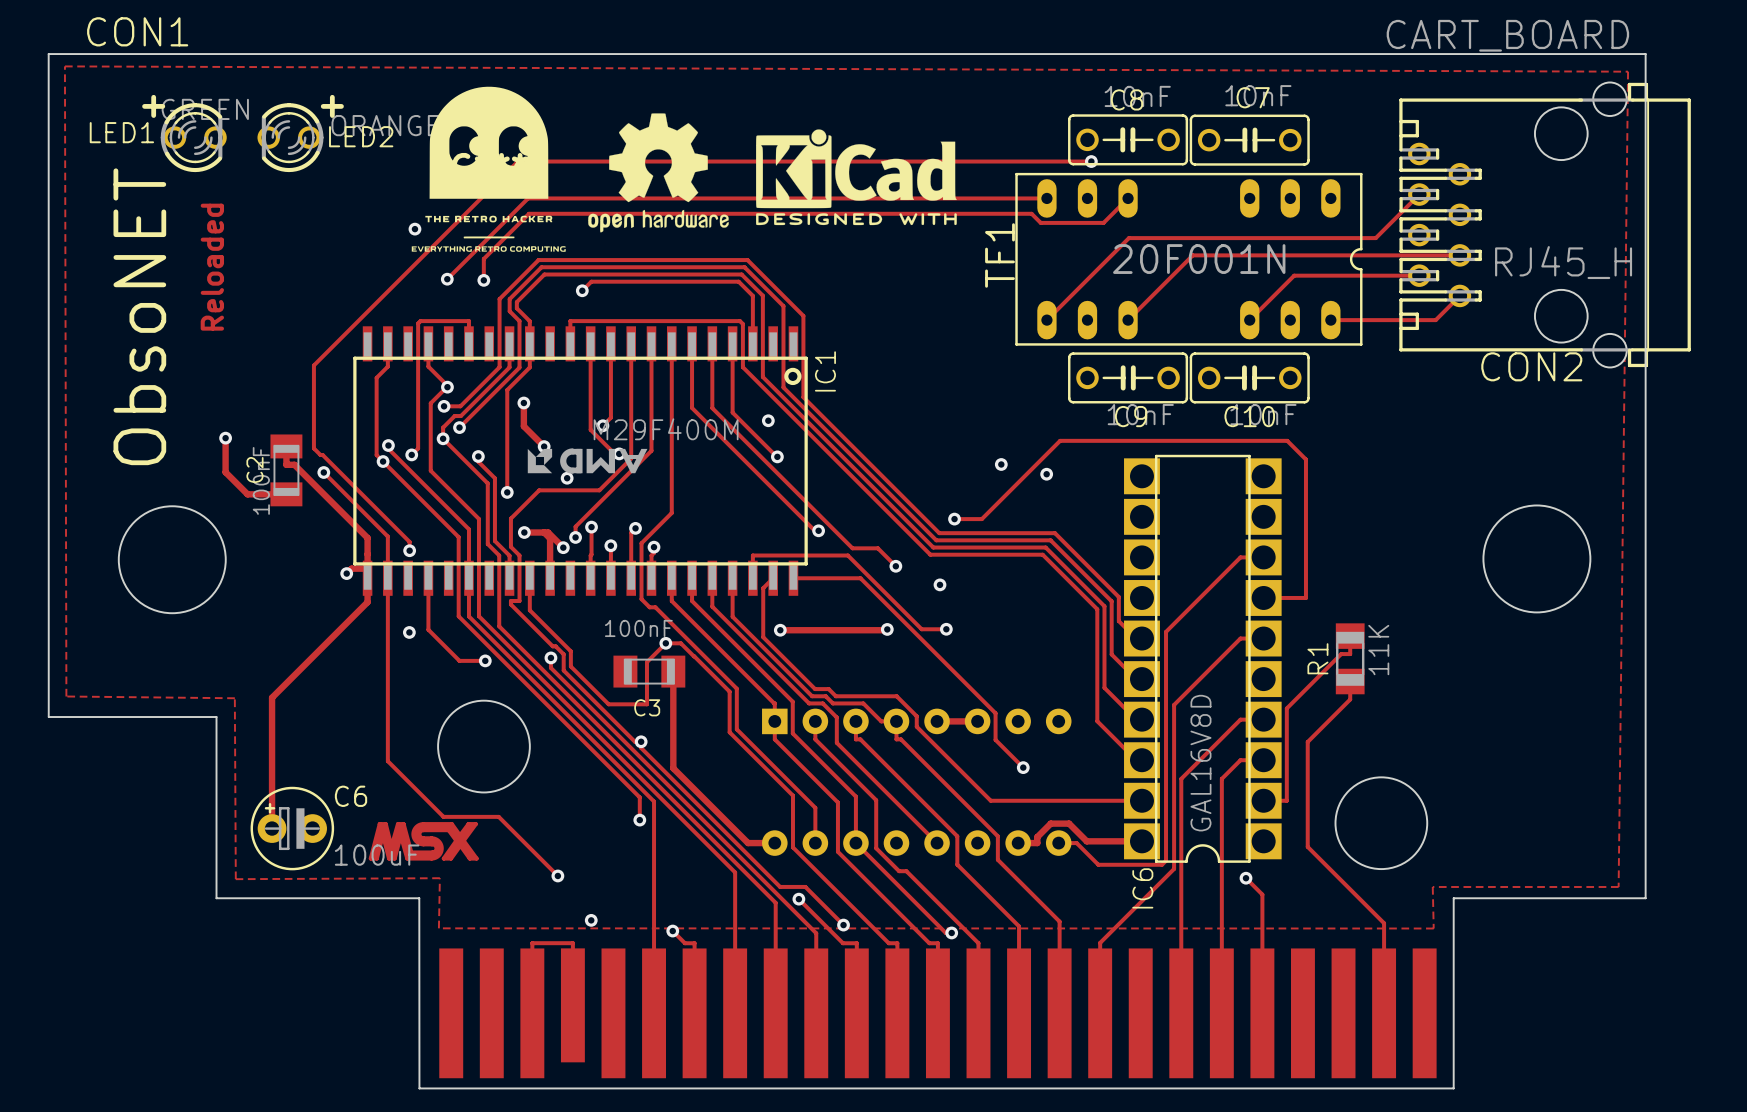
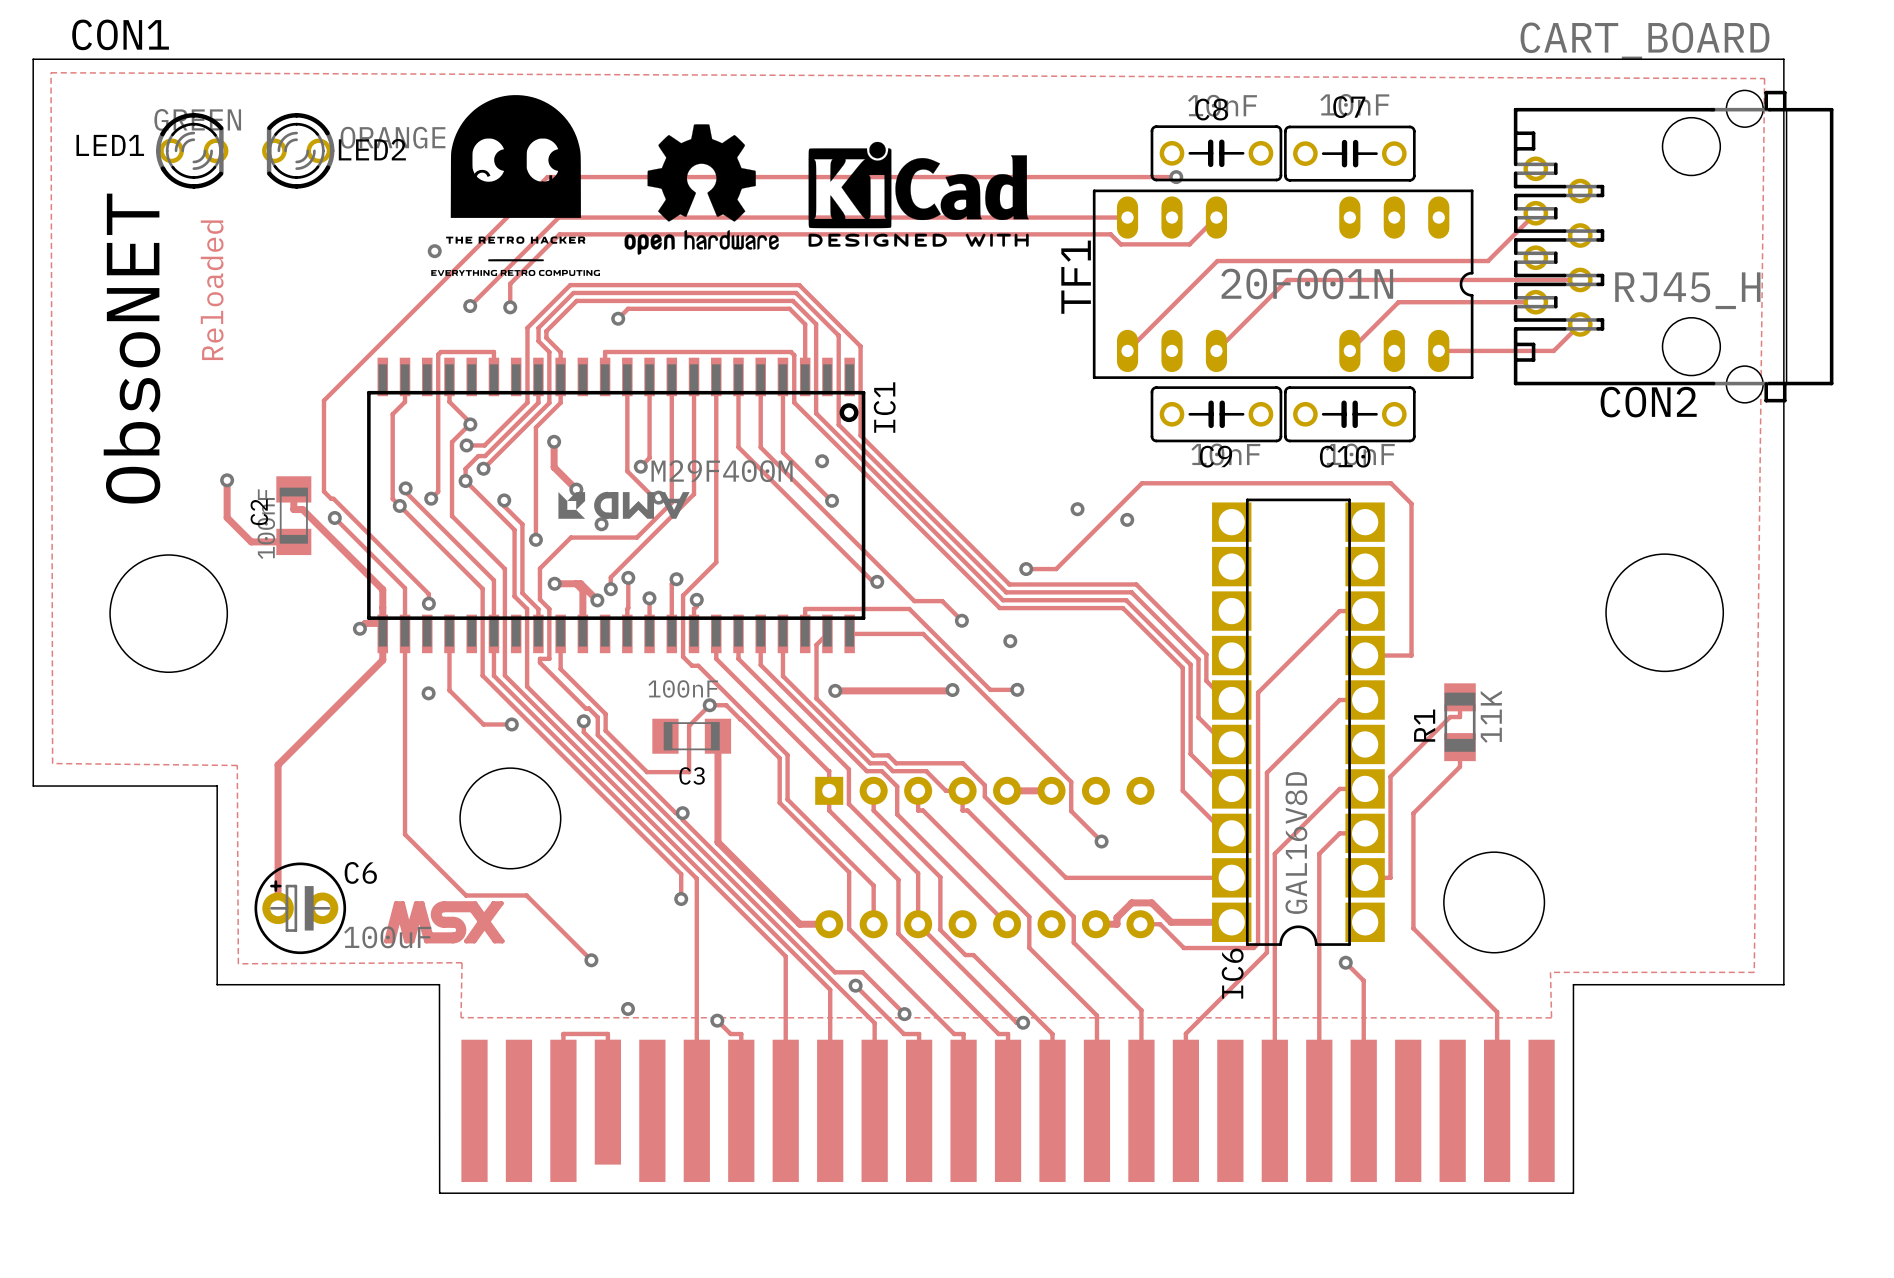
text: + (153, 106) -> none
text: + (332, 106) -> none

